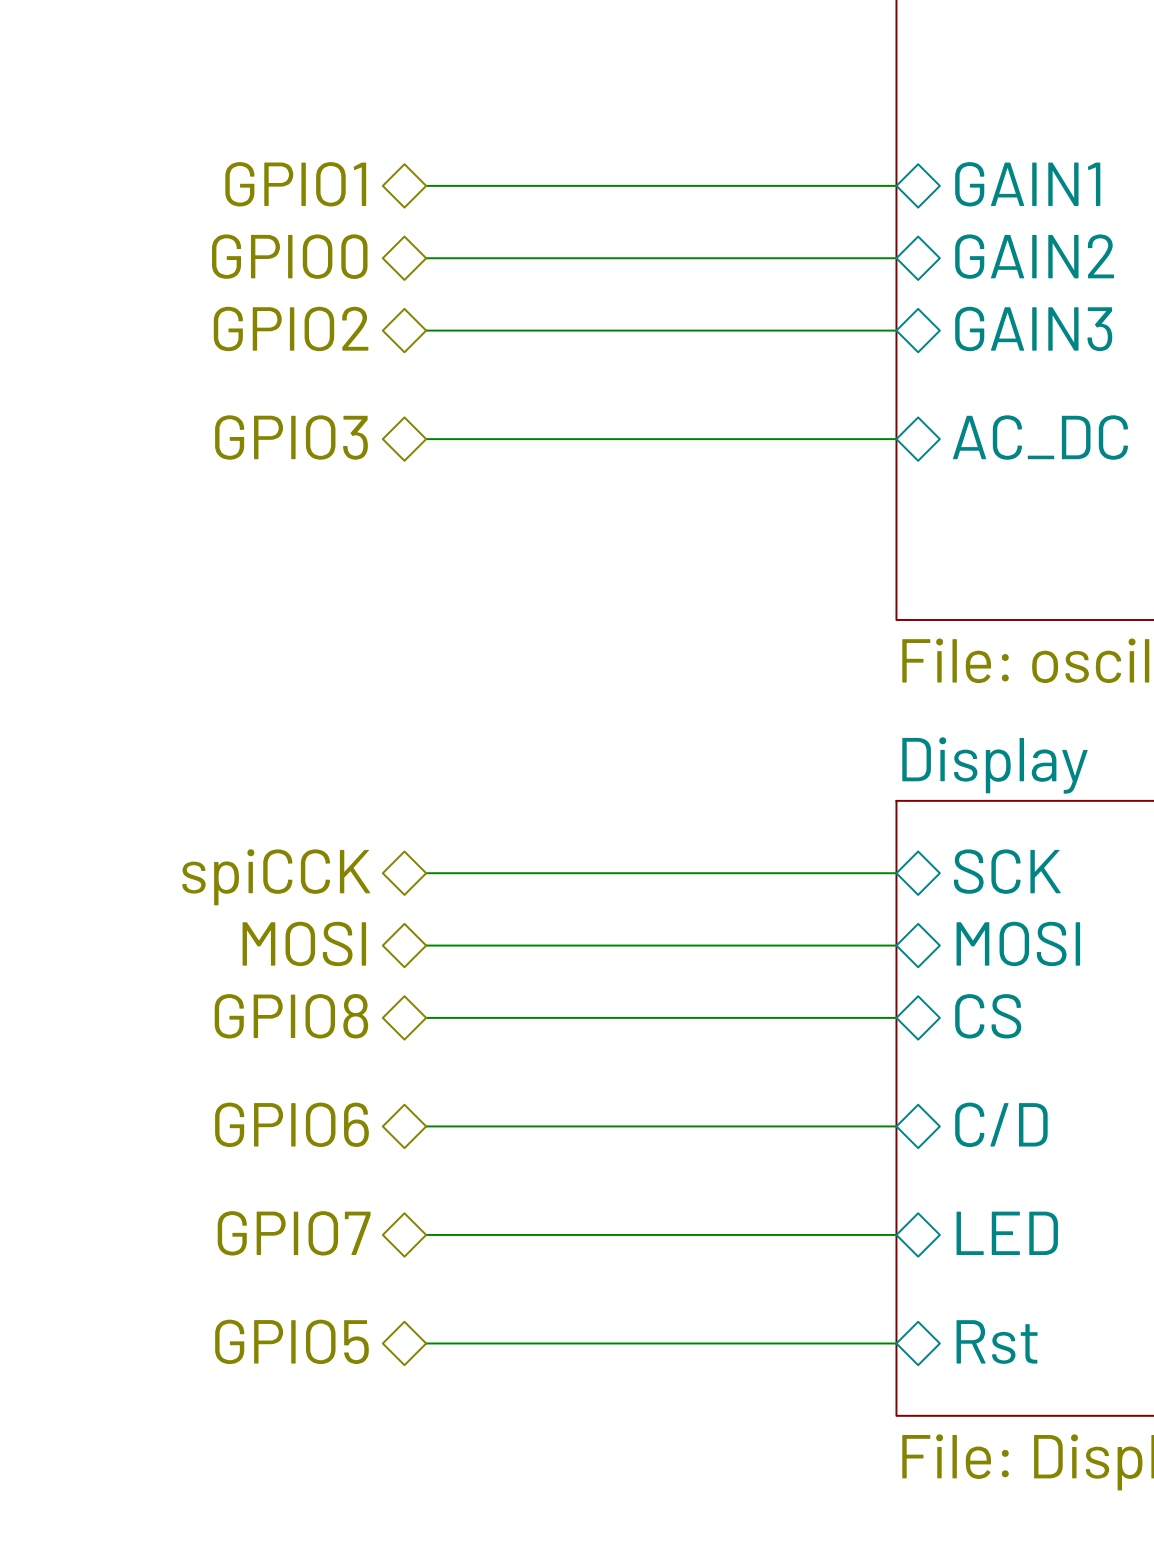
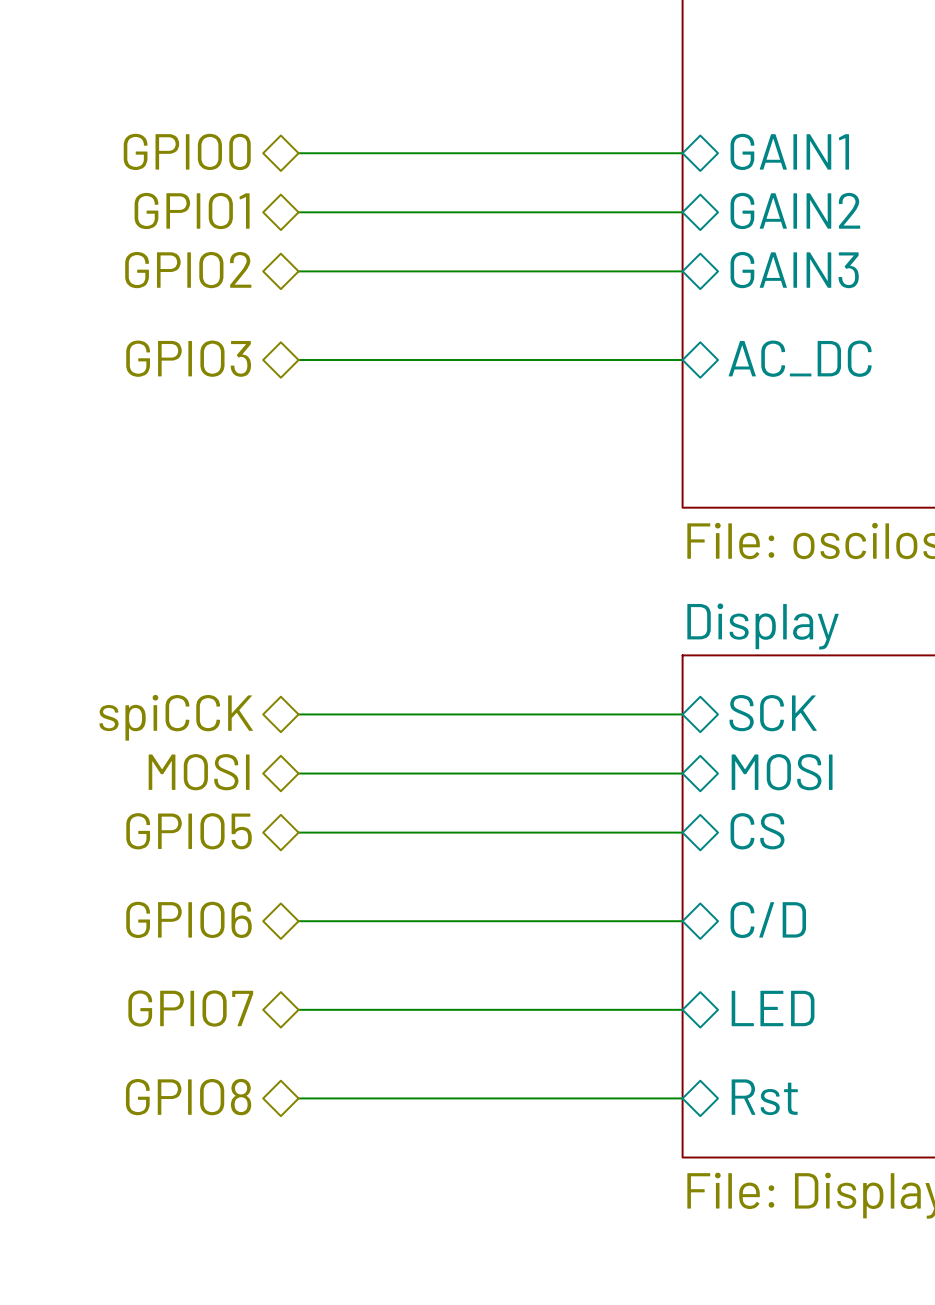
hierarchical label: GPIO1 (295, 184) -> GPIO0 (187, 151)
hierarchical label: GPIO0 (289, 256) -> GPIO1 (192, 210)
hierarchical label: GPIO8 (291, 1016) -> GPIO5 (189, 831)
hierarchical label: GPIO5 (292, 1341) -> GPIO8 (188, 1097)

